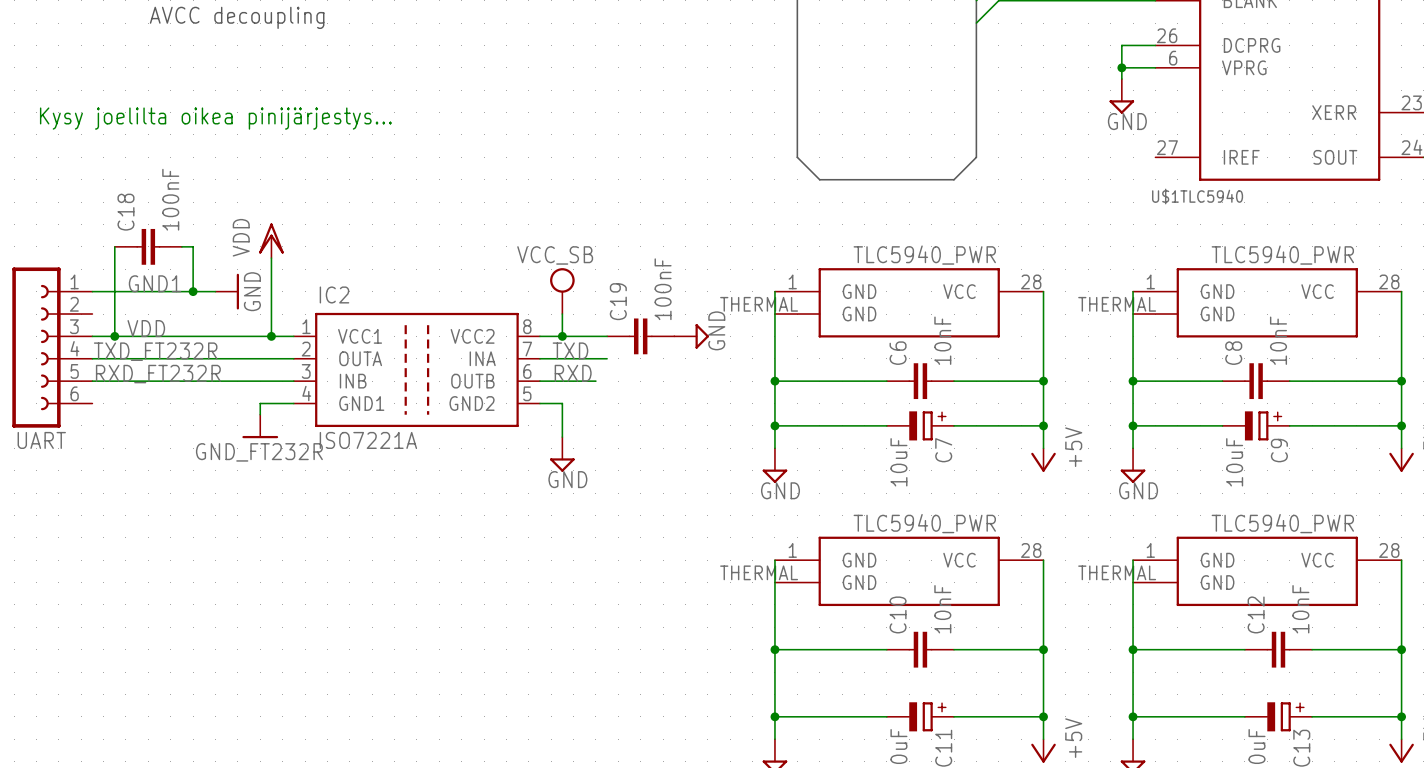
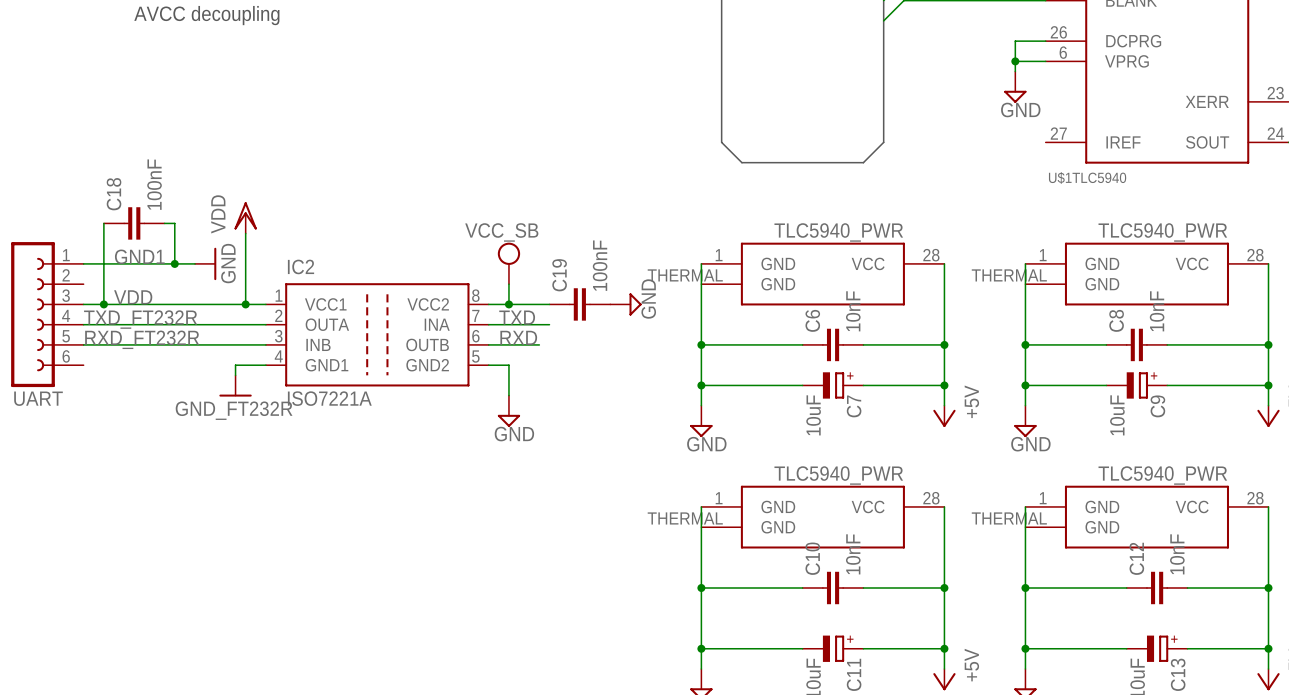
text: Kysy joelilta oikea pinijärjestys... (215, 118) -> none

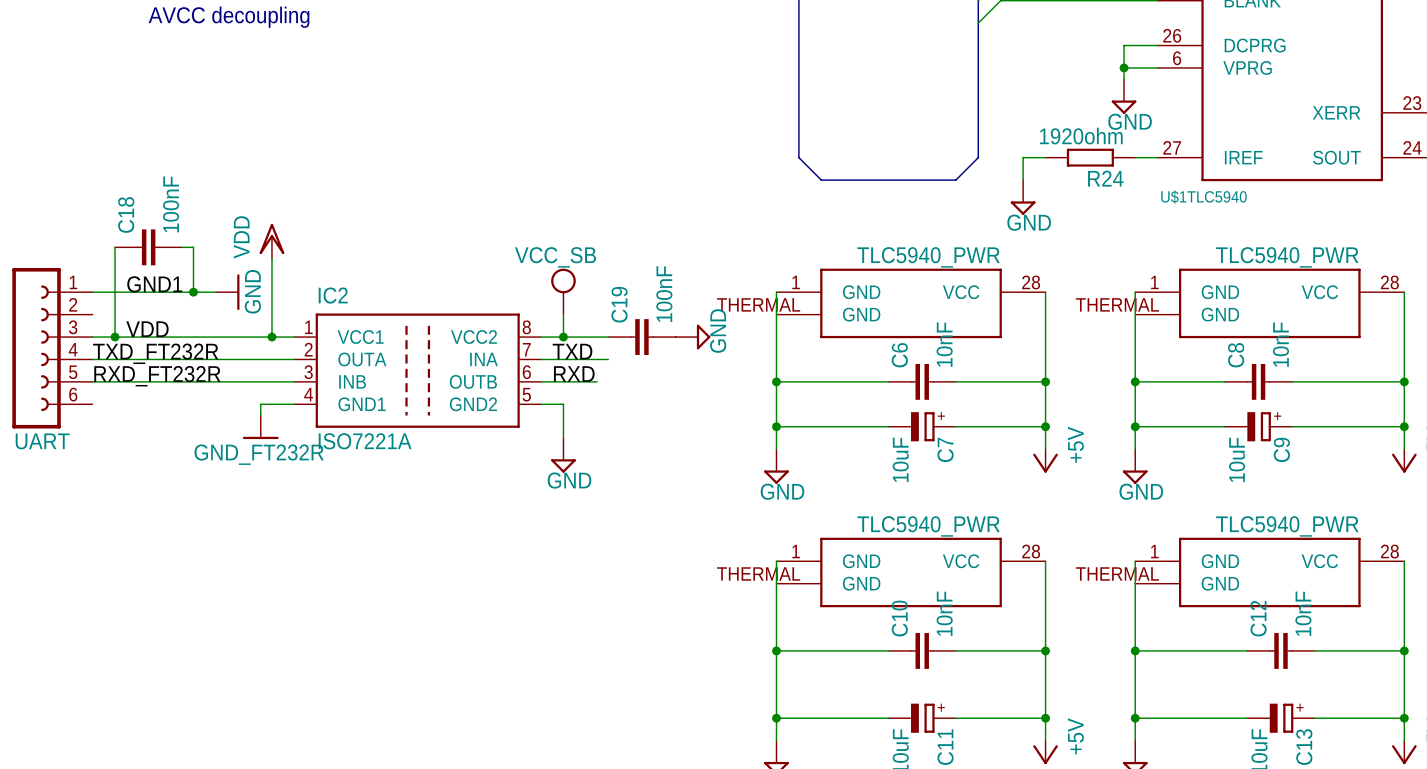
wire: none -> (1045, 157) (1023, 157) (1023, 180)
R24: none -> 1920ohm (1090, 157)
wire: none -> (1135, 157) (1157, 157)
power symbol: none -> GND (1023, 197)

